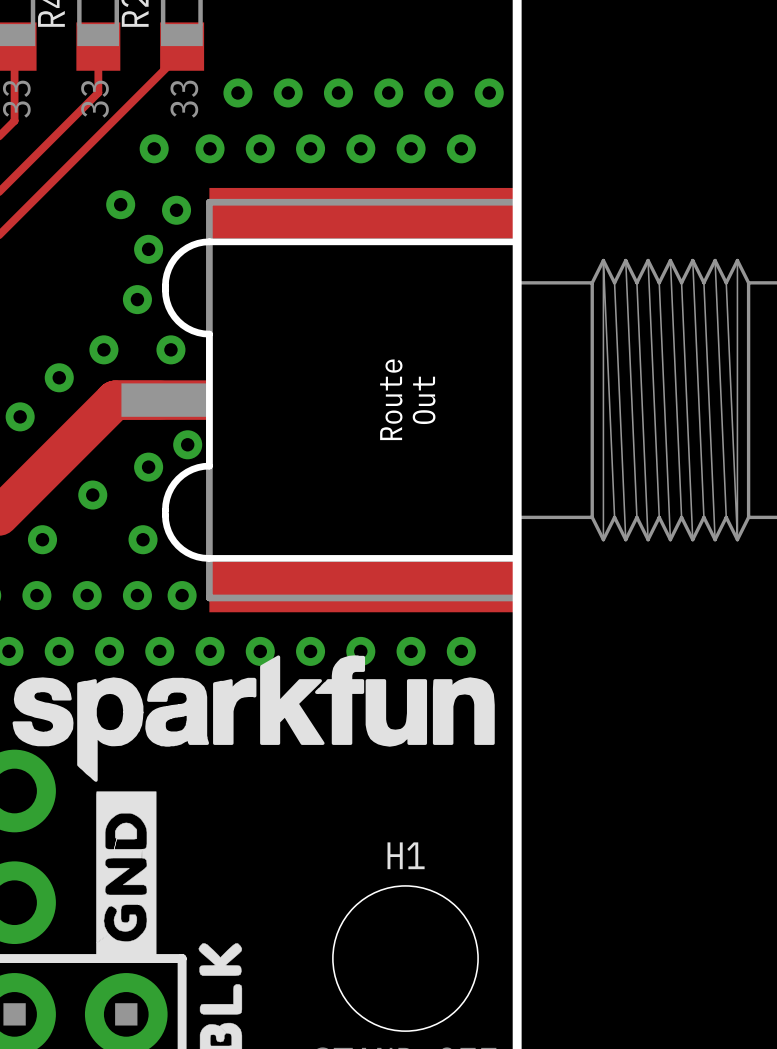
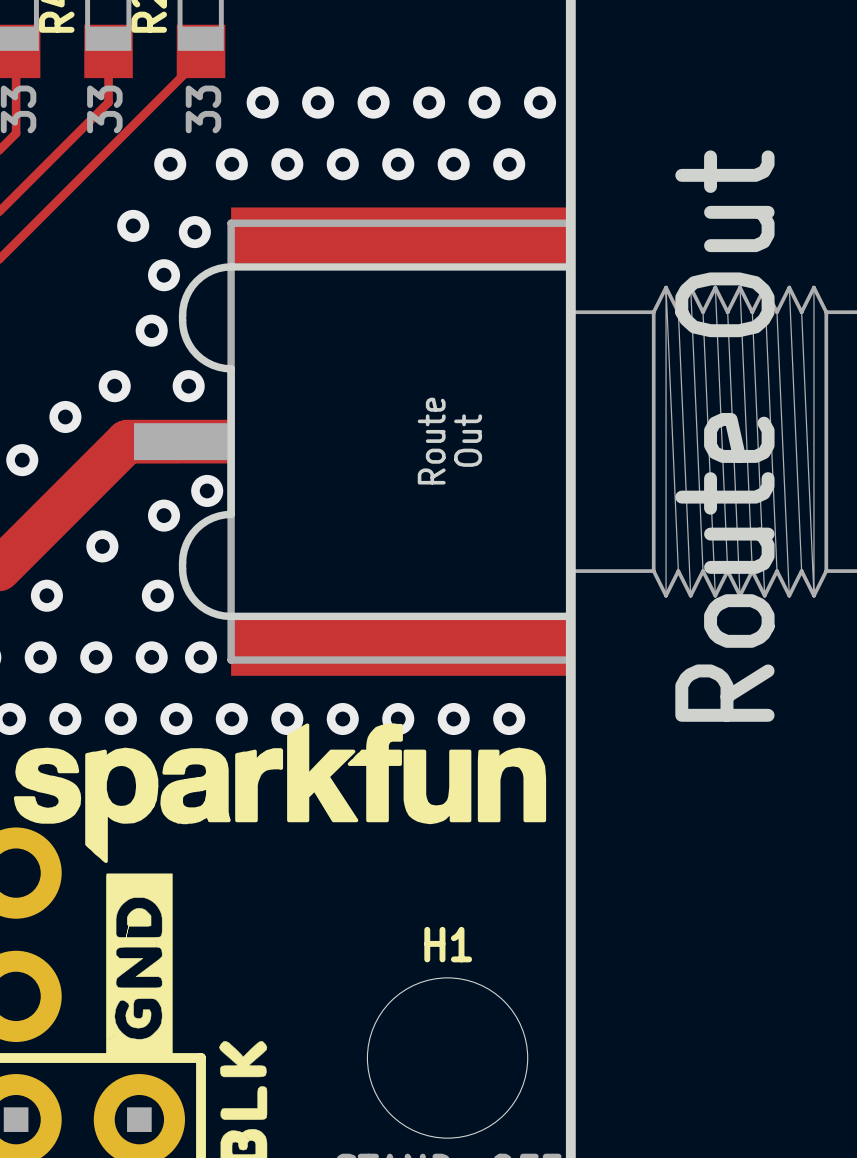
text: none -> Route Out (724, 436)

